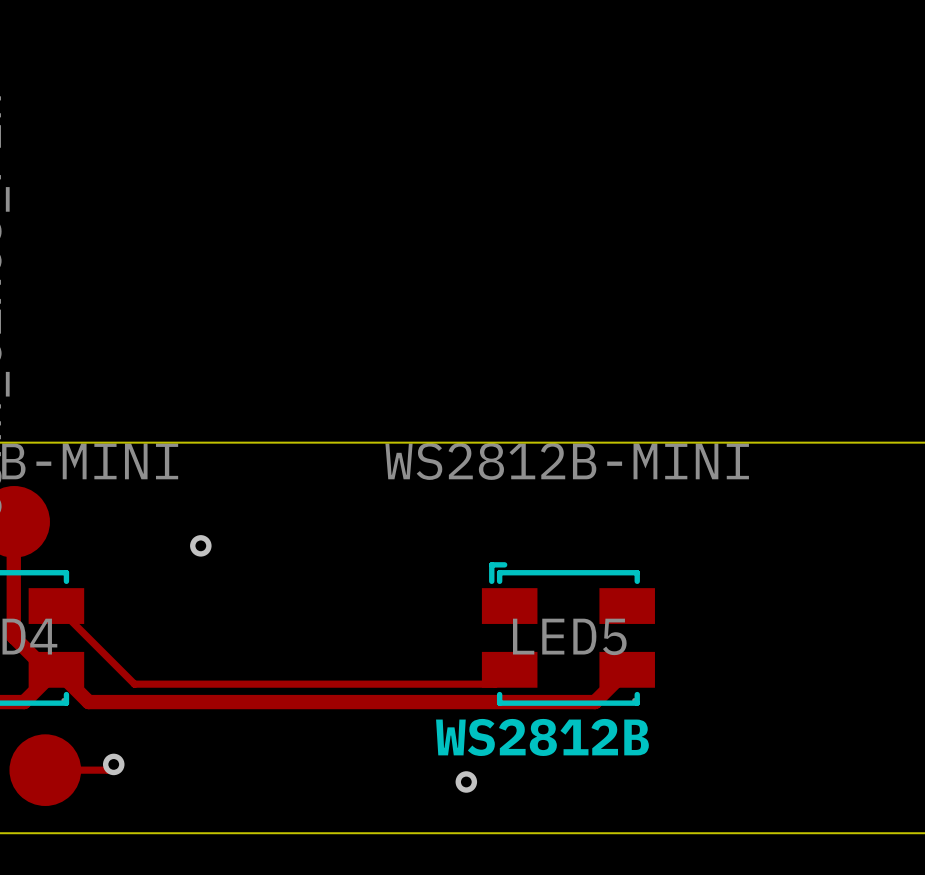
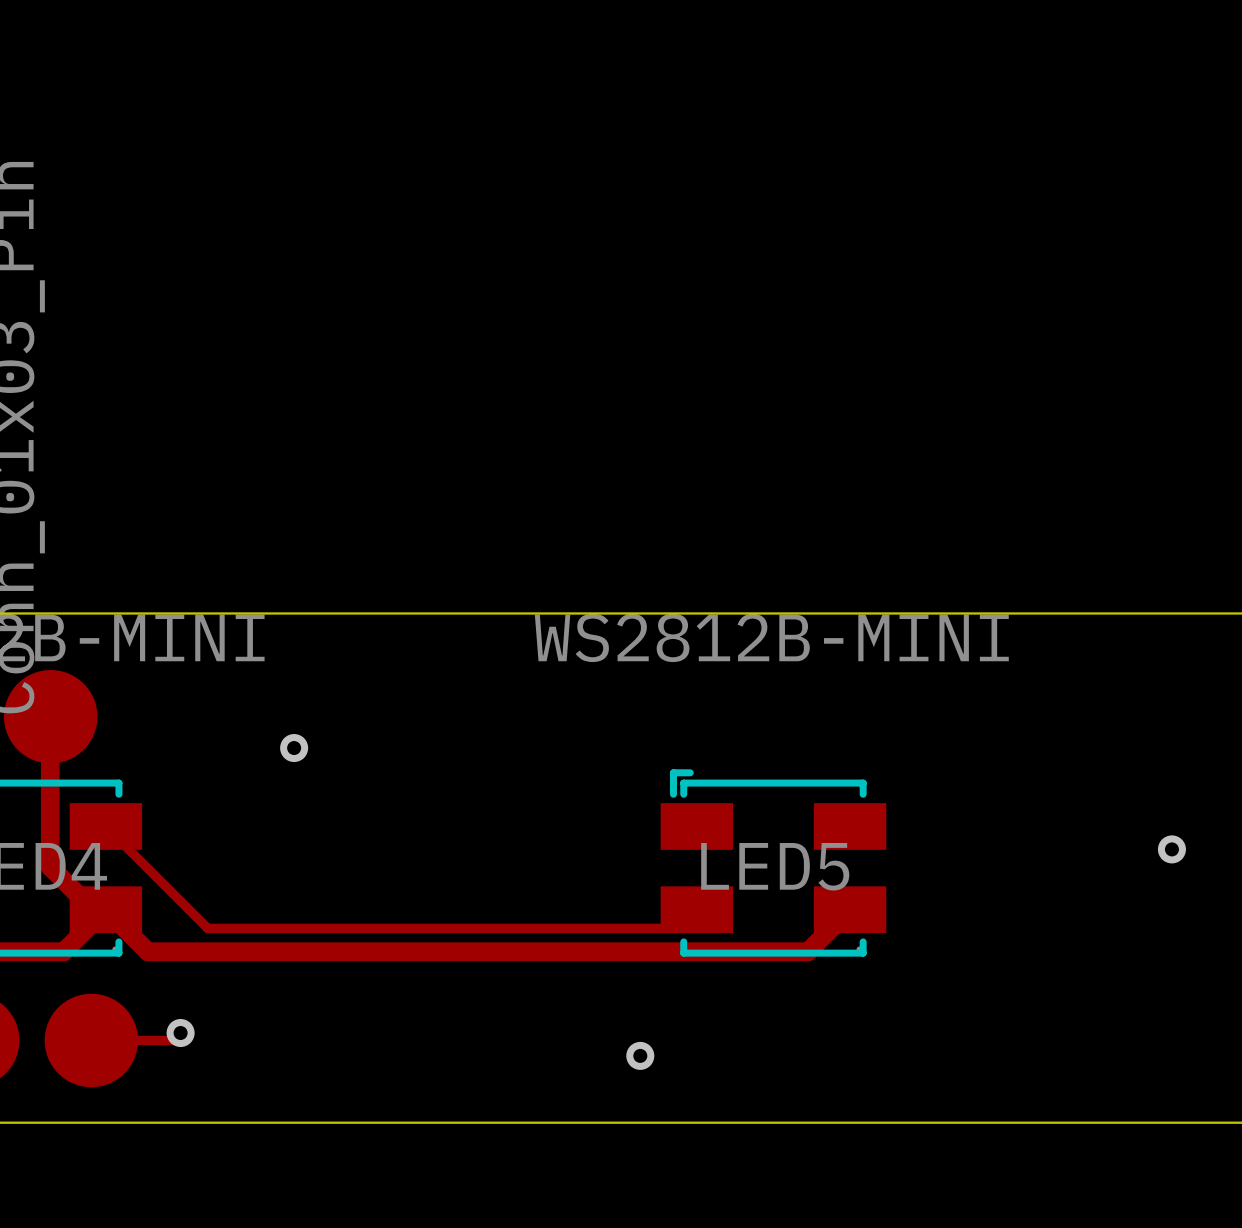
via: none -> (1171, 849)
text: WS2812B (542, 737) -> none

